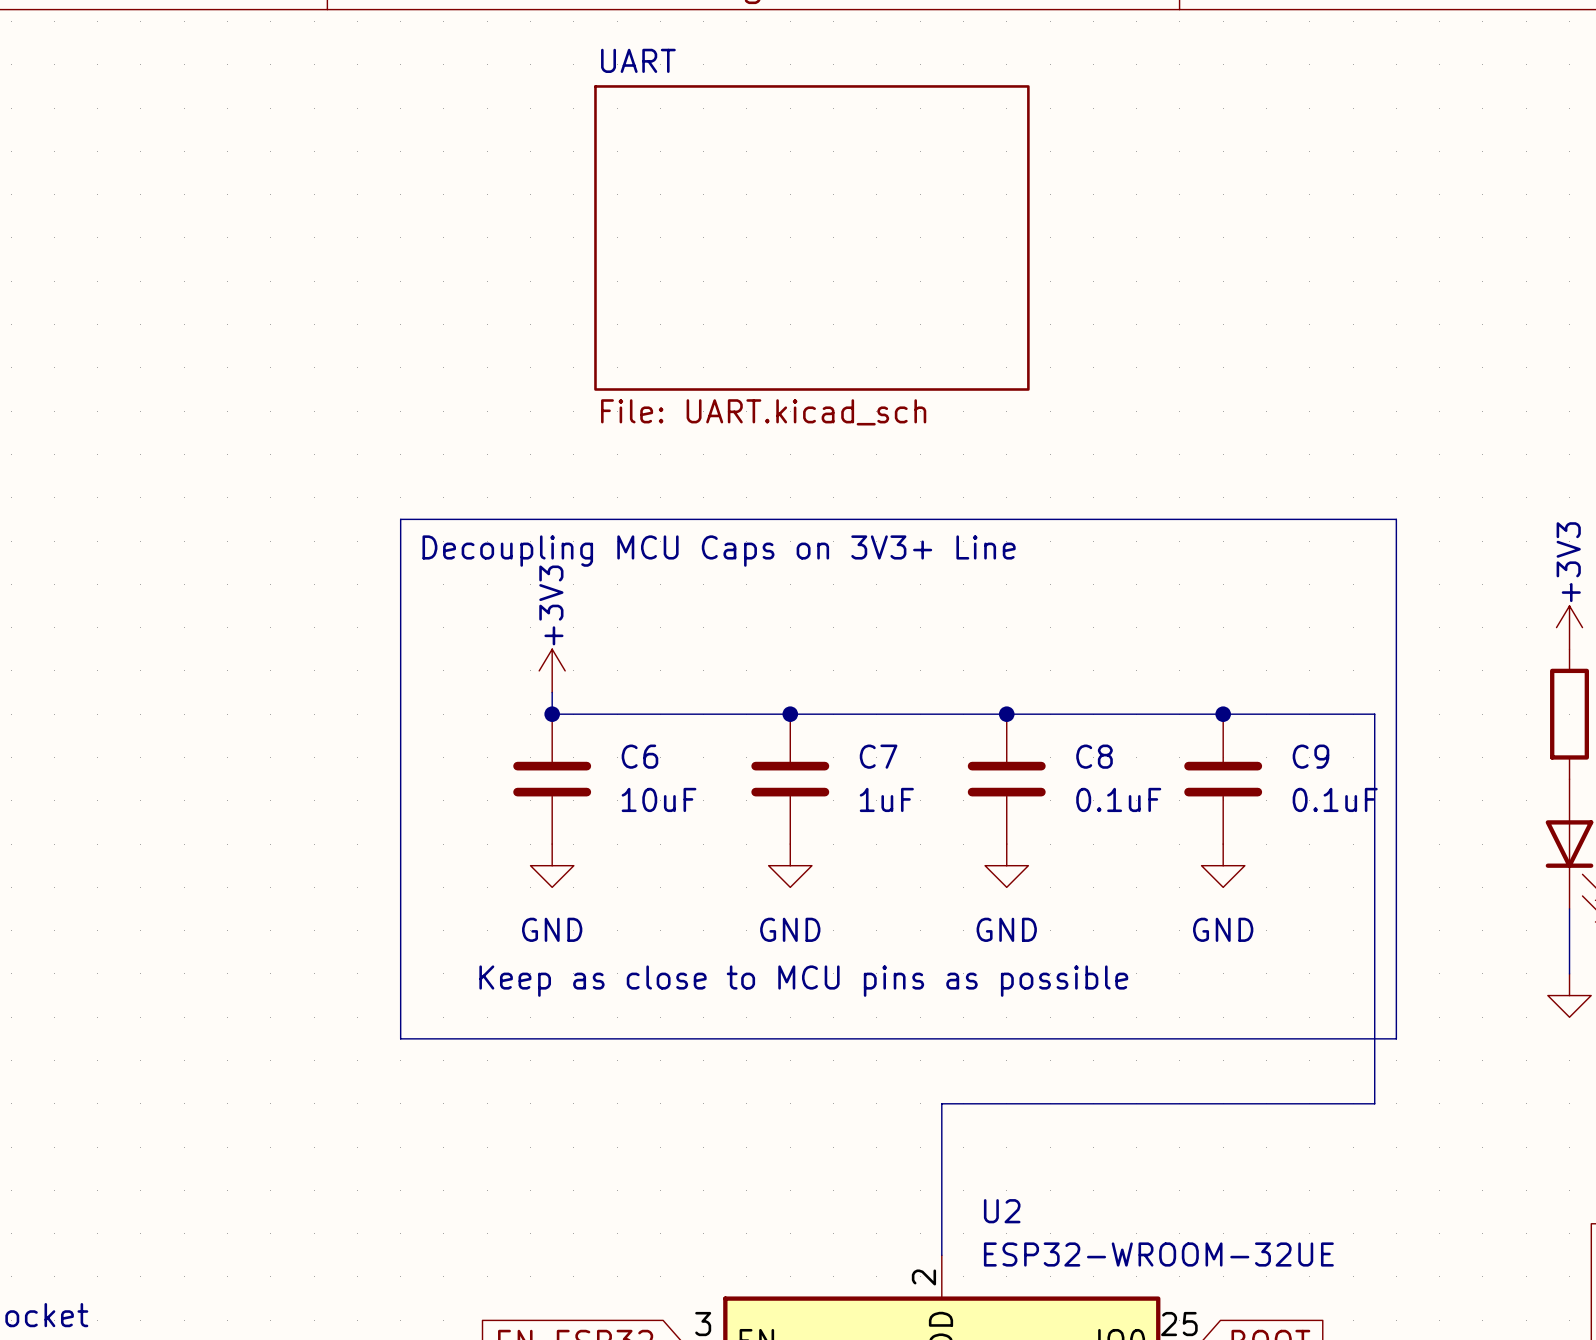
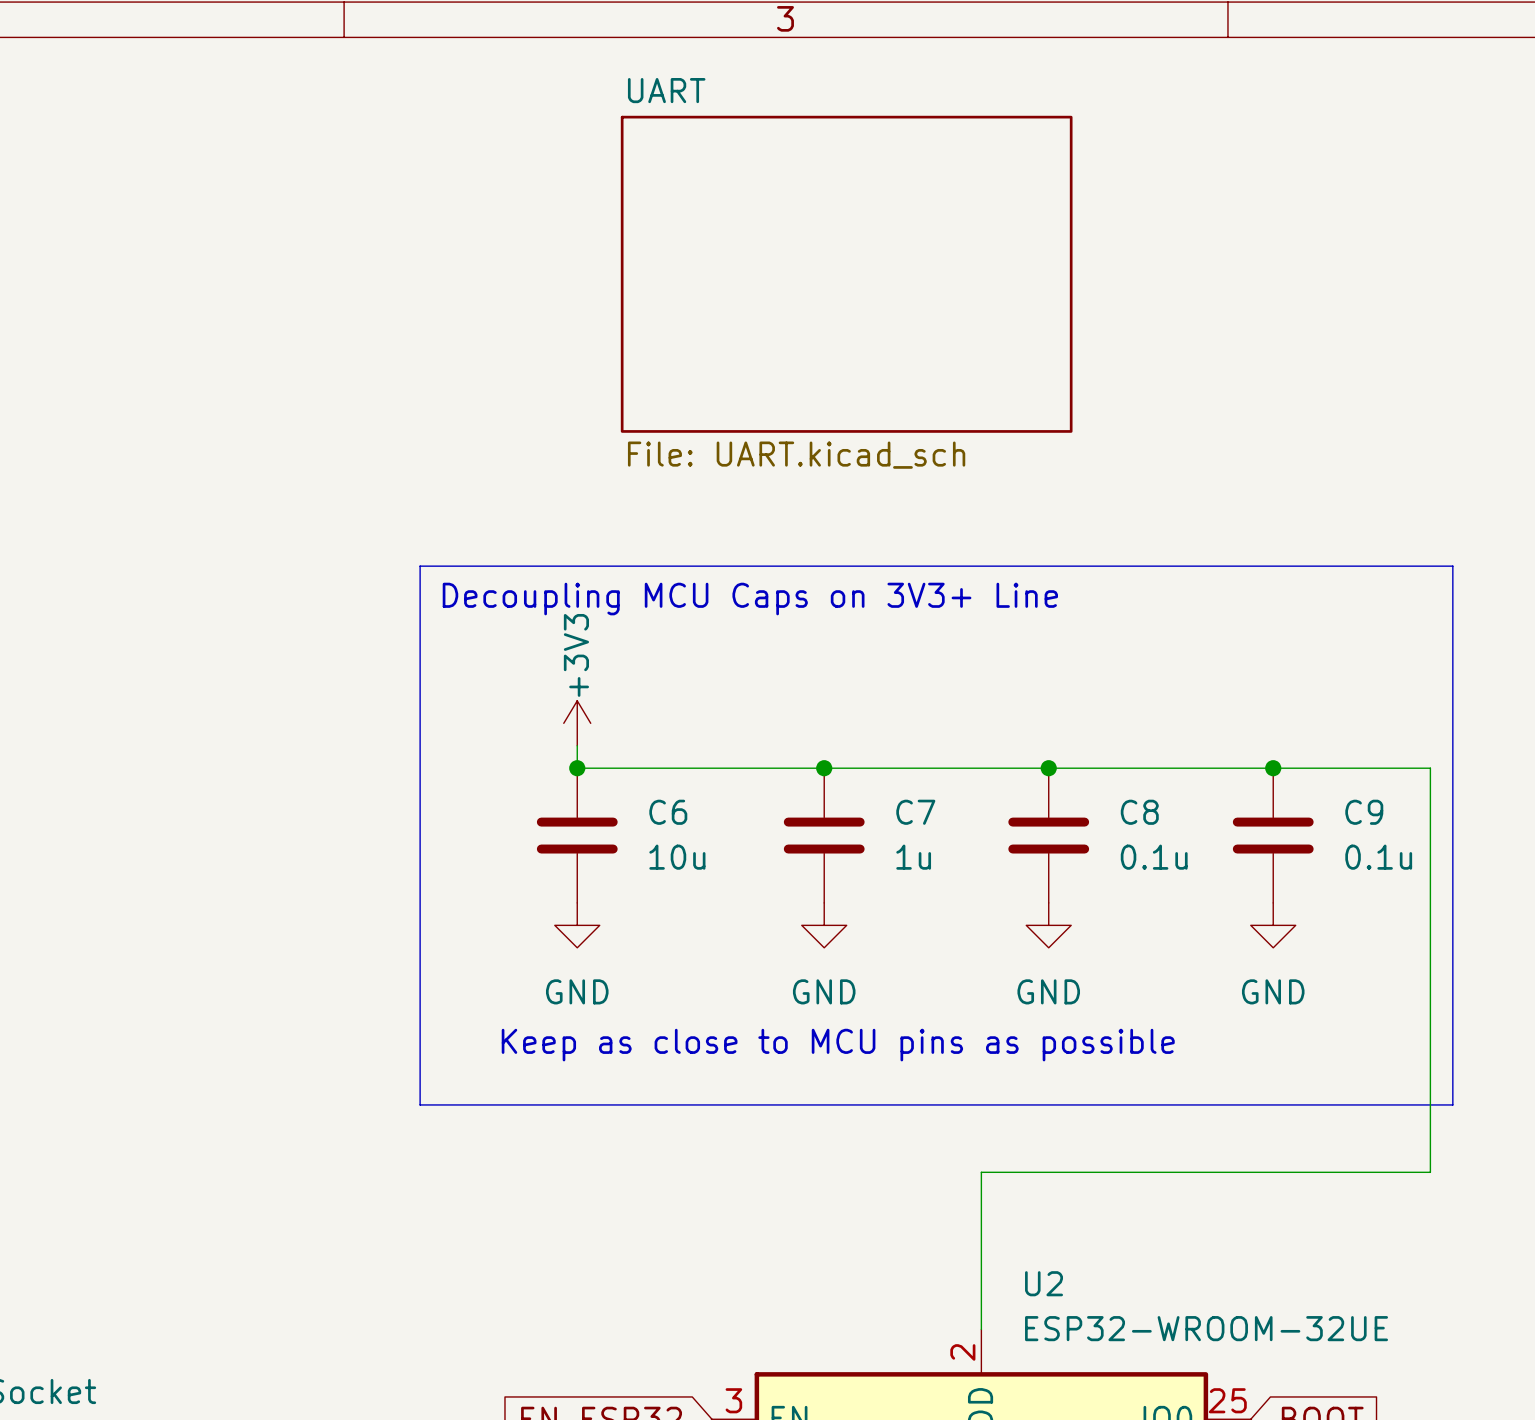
C6 value: 10uF (659, 799) -> 10u (677, 857)
C7 value: 1uF (886, 799) -> 1u (913, 857)
C8 value: 0.1uF (1118, 799) -> 0.1u (1154, 857)
C9 value: 0.1uF (1335, 799) -> 0.1u (1378, 857)

